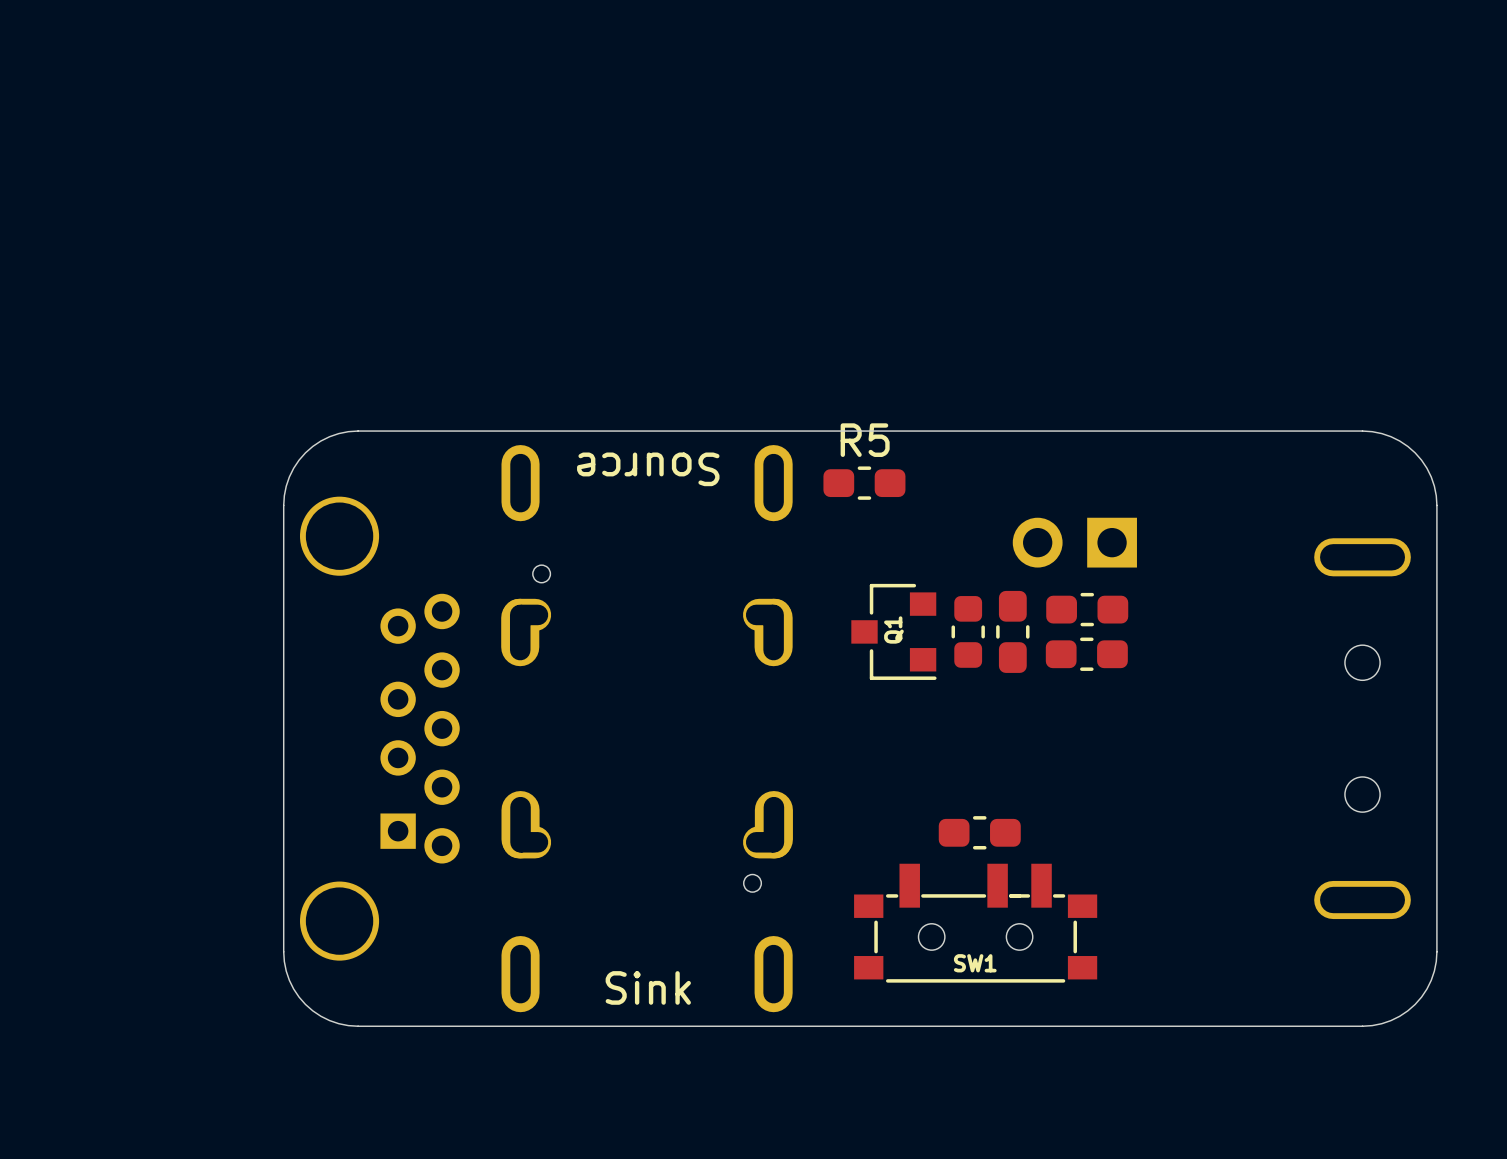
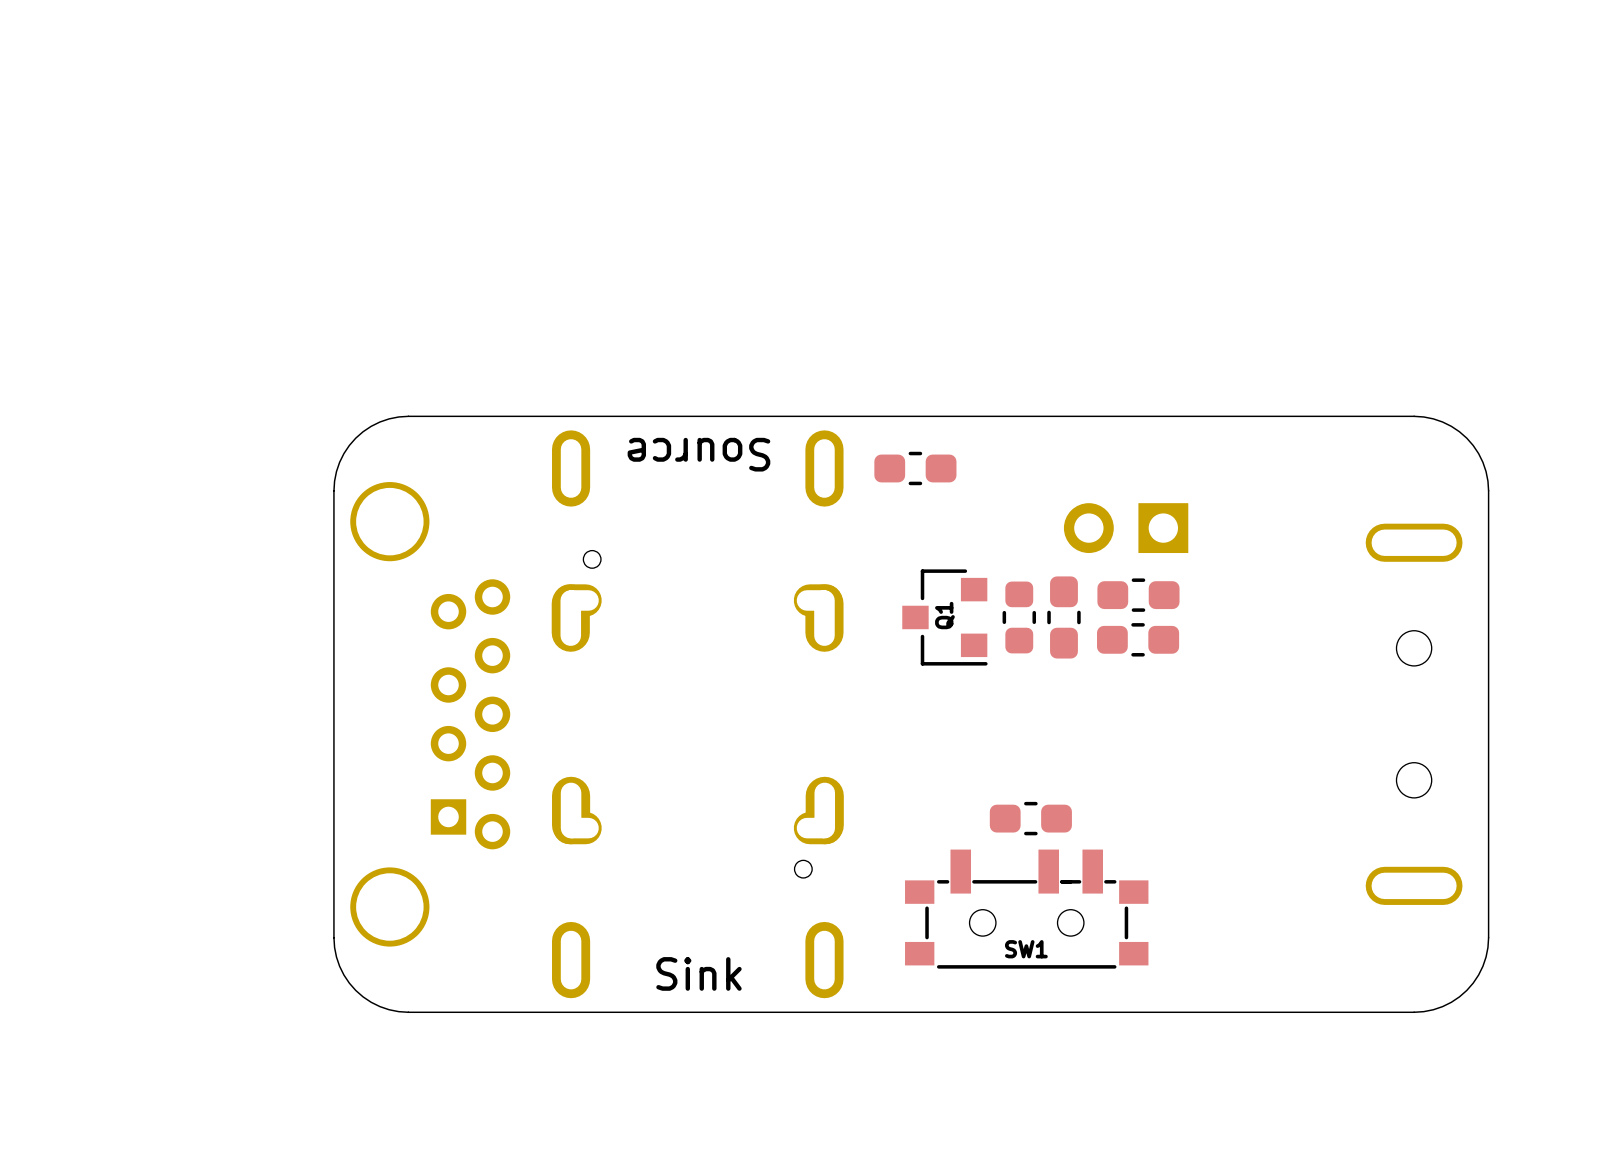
R5 name: R5 (865, 440) -> none

